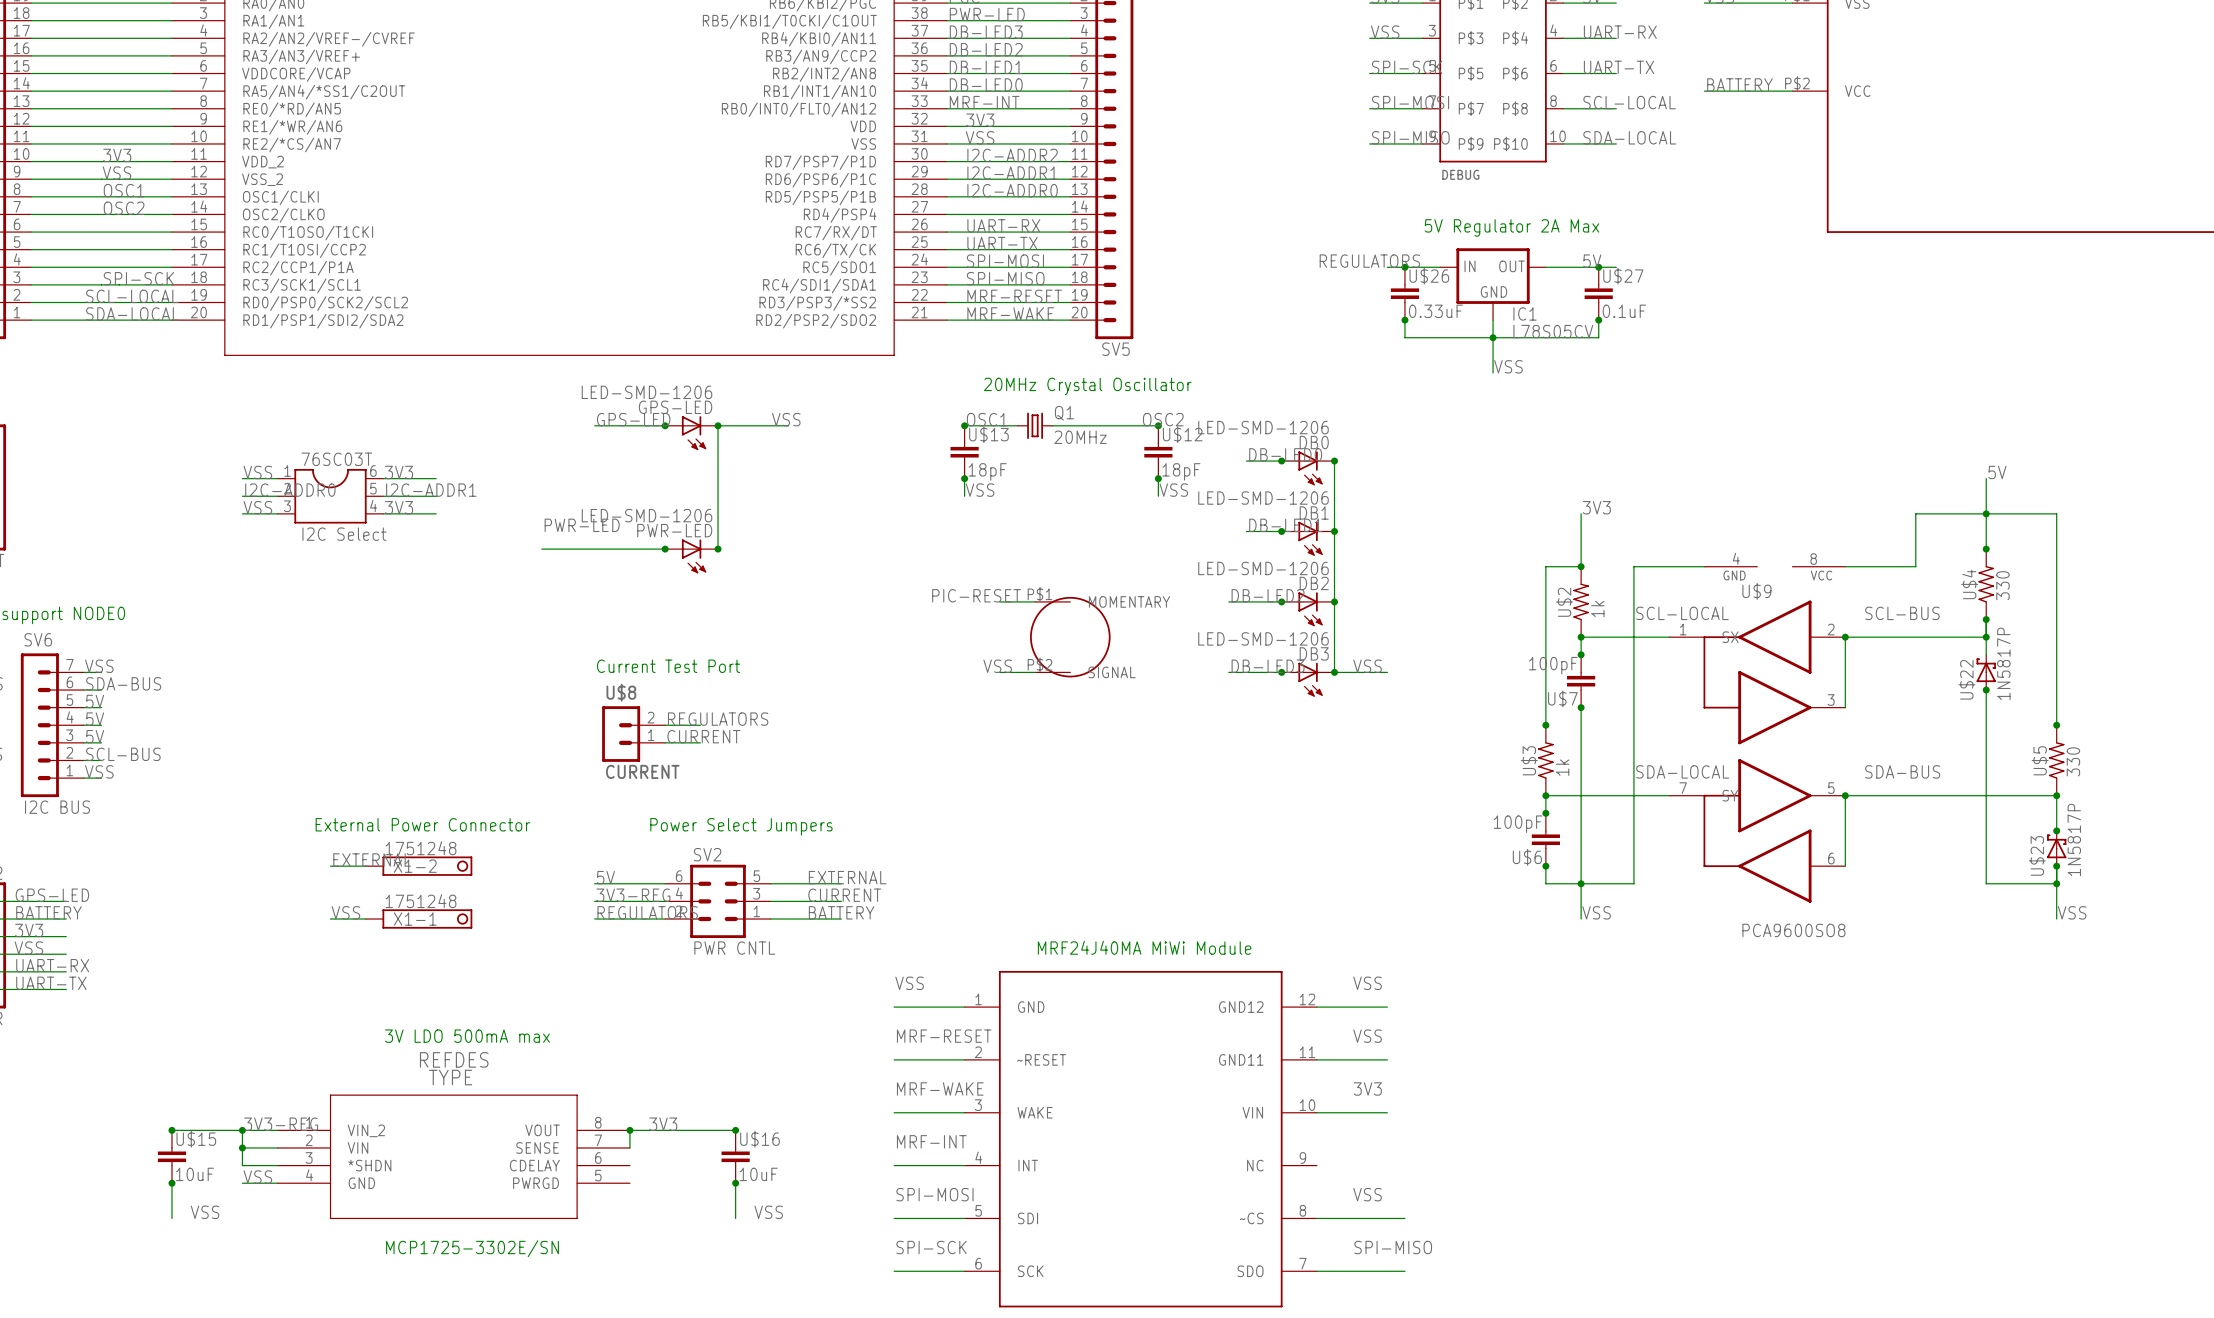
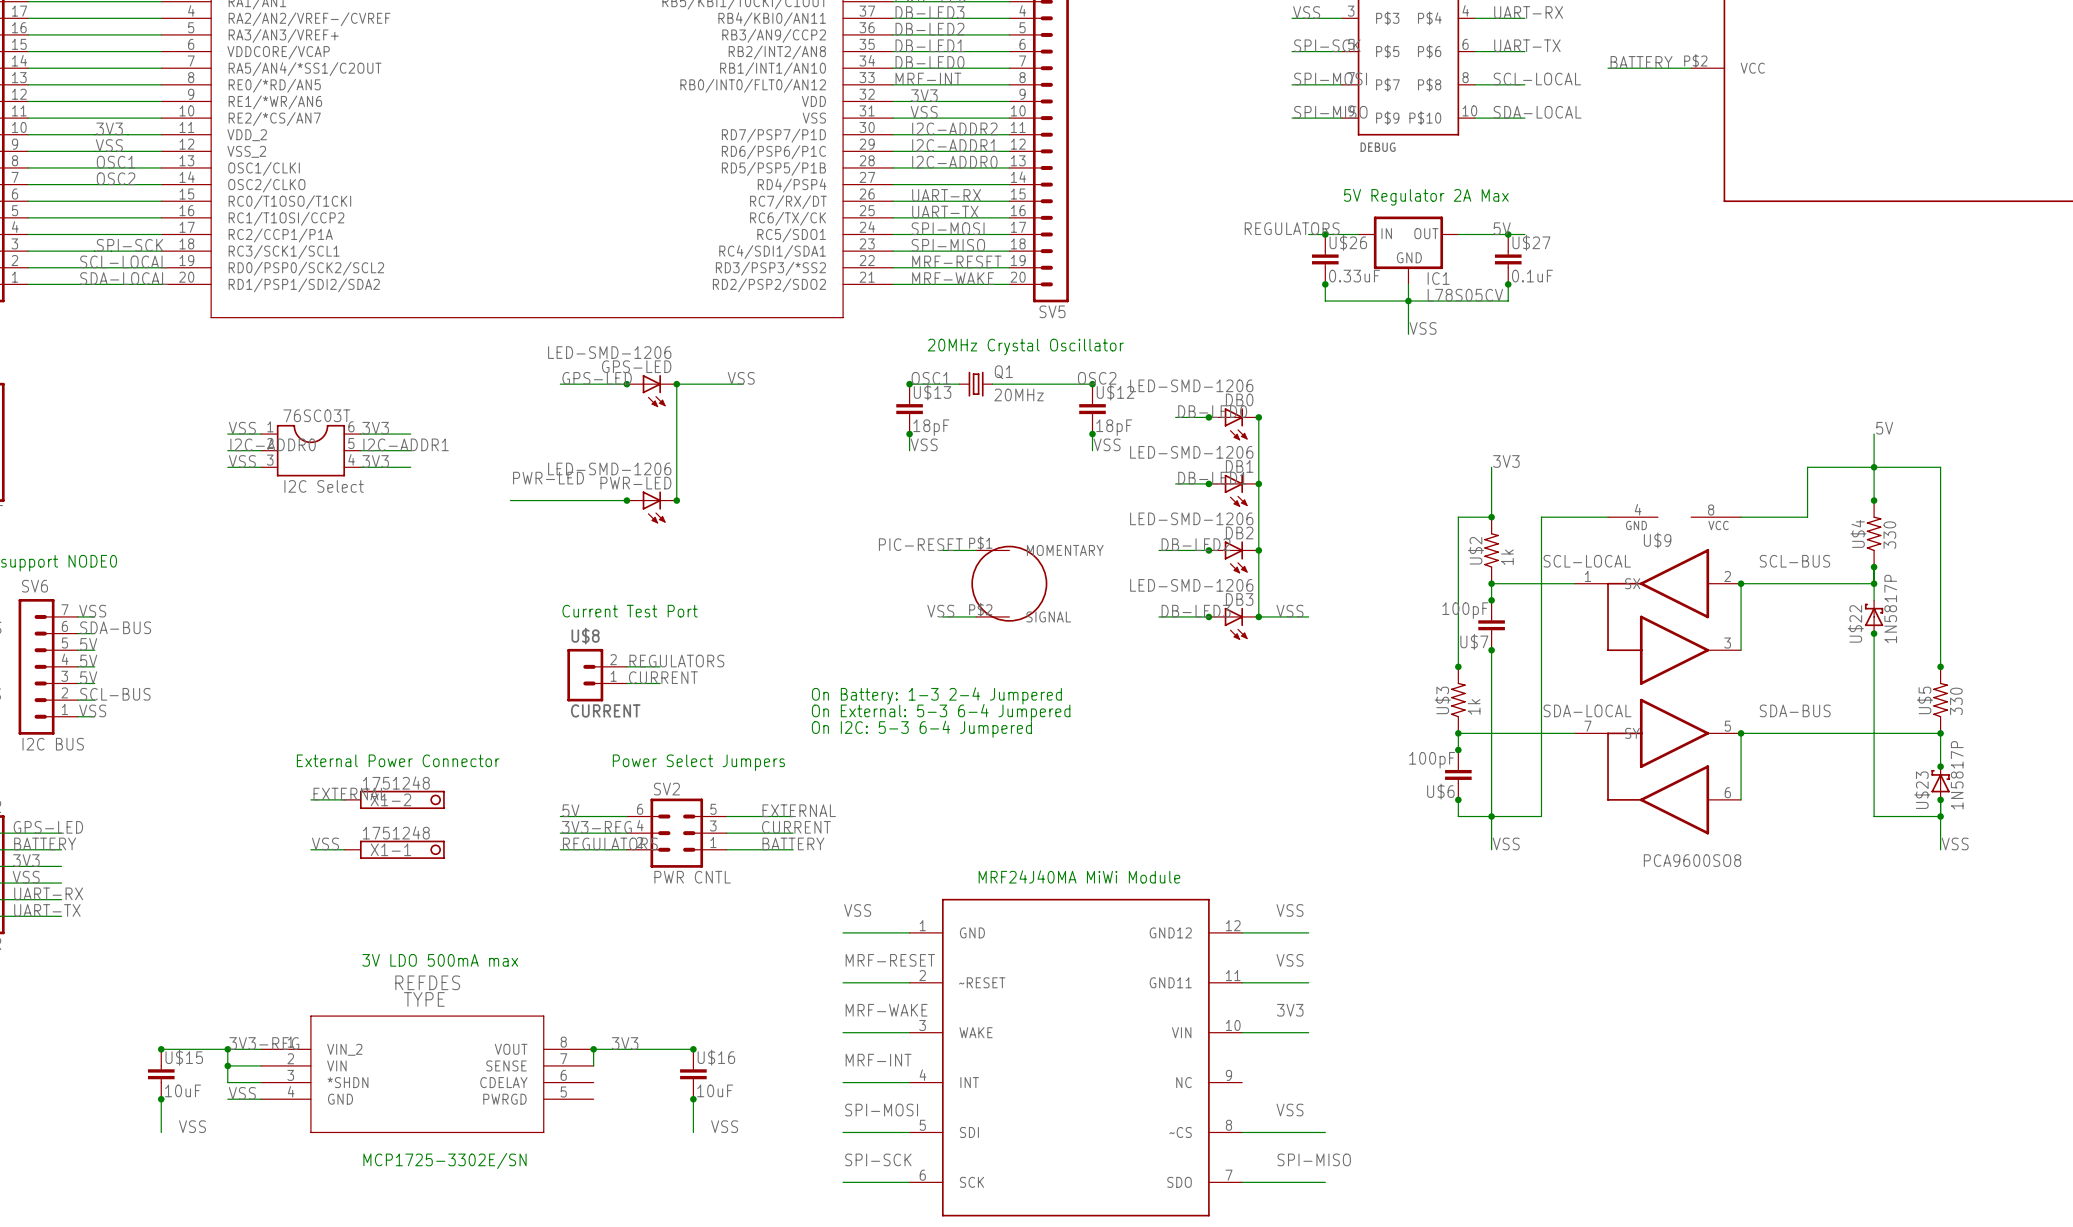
text: none -> On Battery: 1-3 2-4 Jumpered (936, 695)
text: none -> On External: 5-3 6-4 Jumpered (941, 712)
text: none -> On I2C: 5-3 6-4 Jumpered (921, 729)

